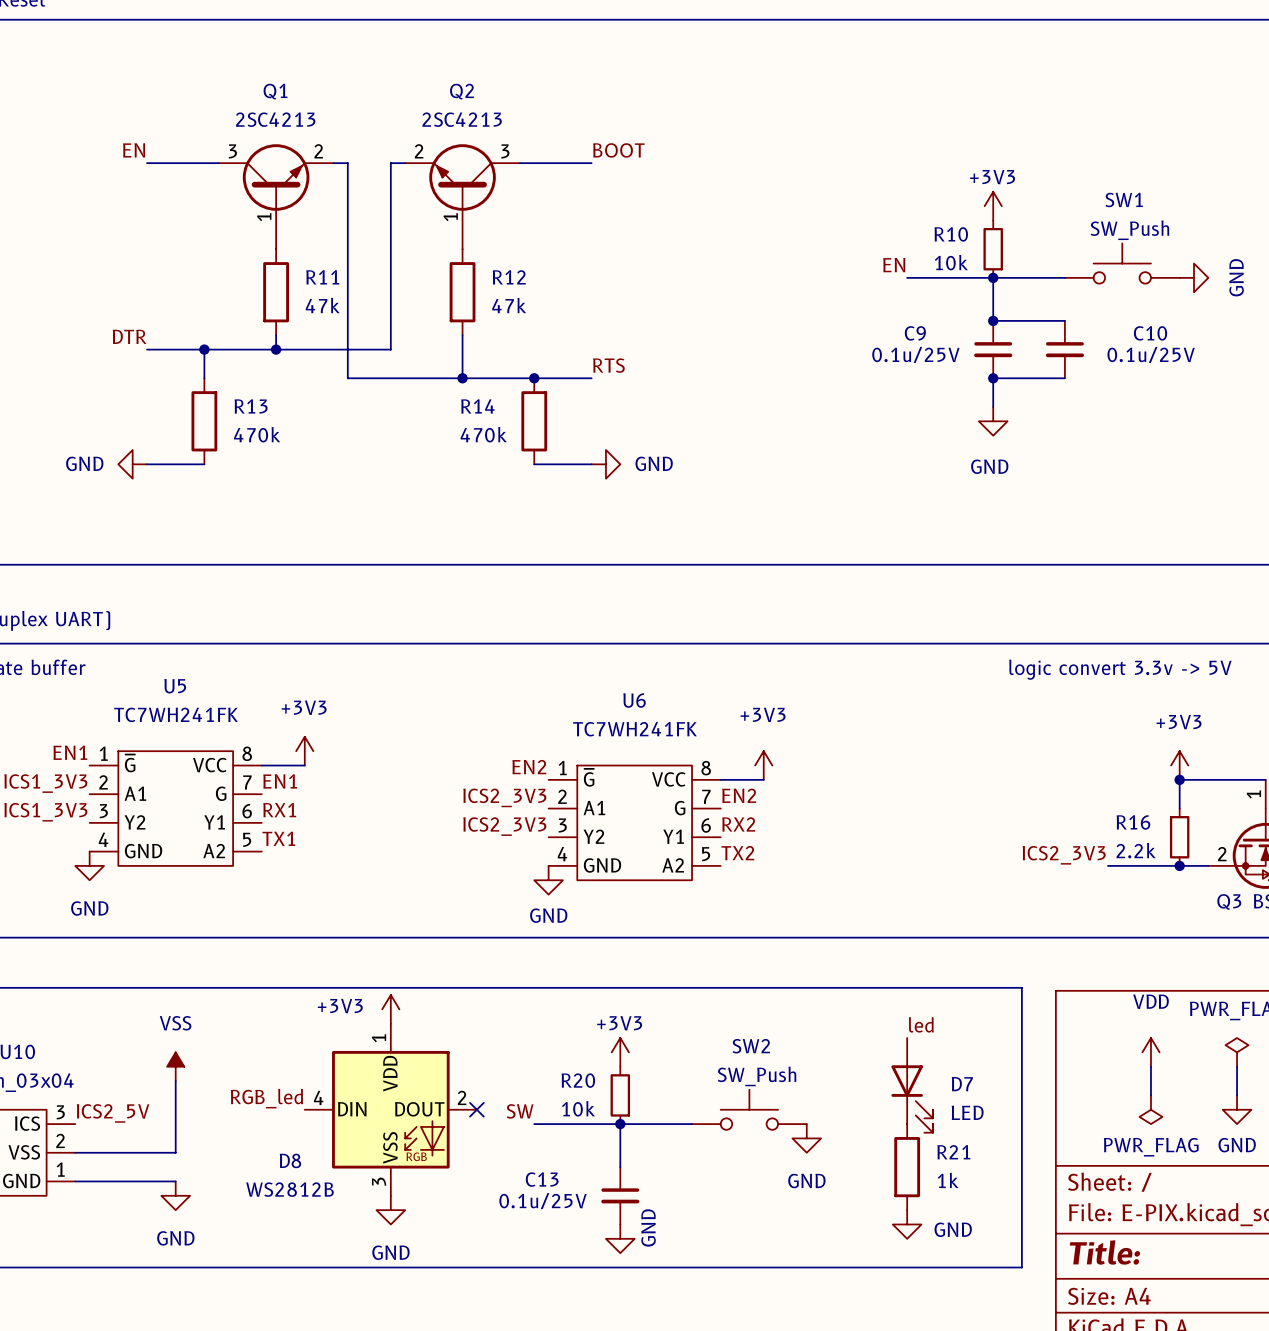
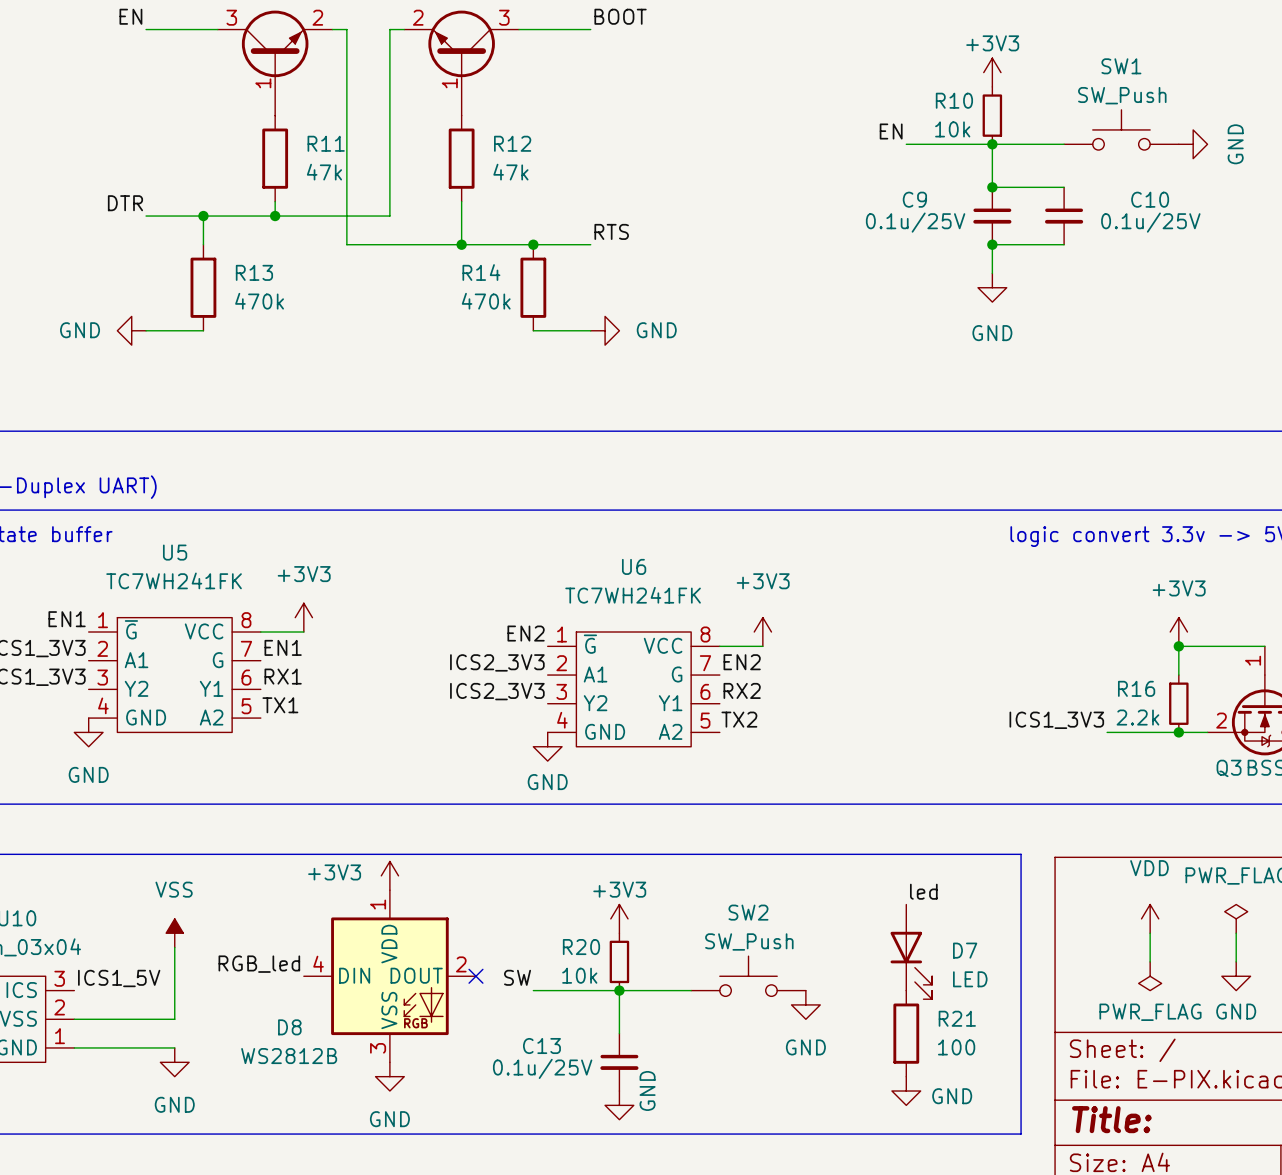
label: ICS2_3V3 (1064, 855) -> ICS1_3V3 (1056, 720)
label: ICS2_5V (113, 1113) -> ICS1_5V (119, 978)
R21 value: 1k (948, 1180) -> 100 (956, 1047)

